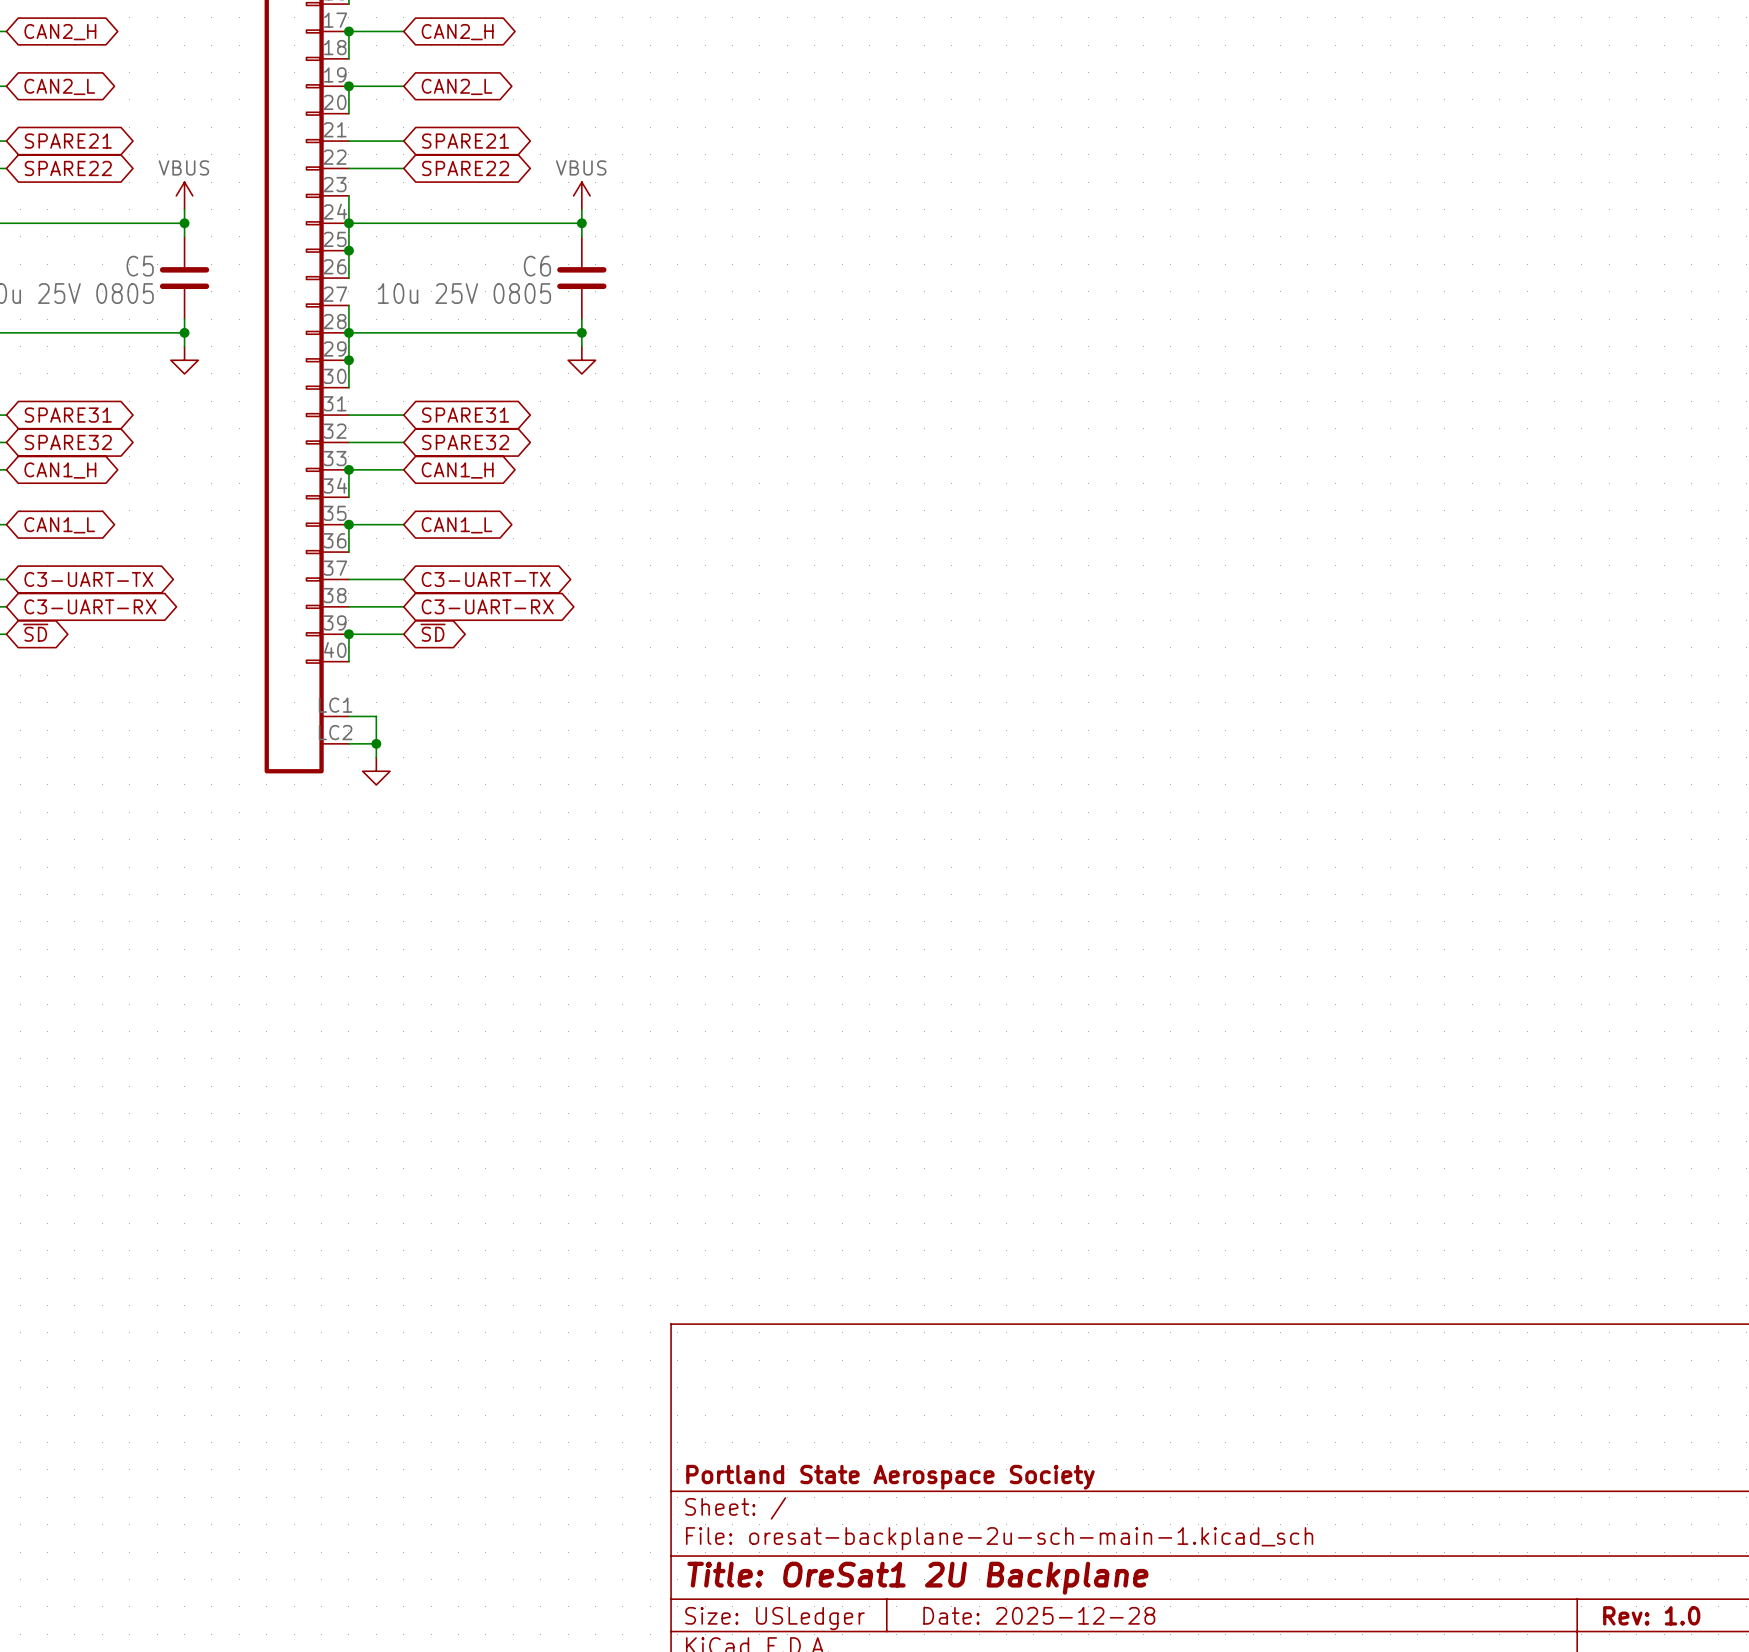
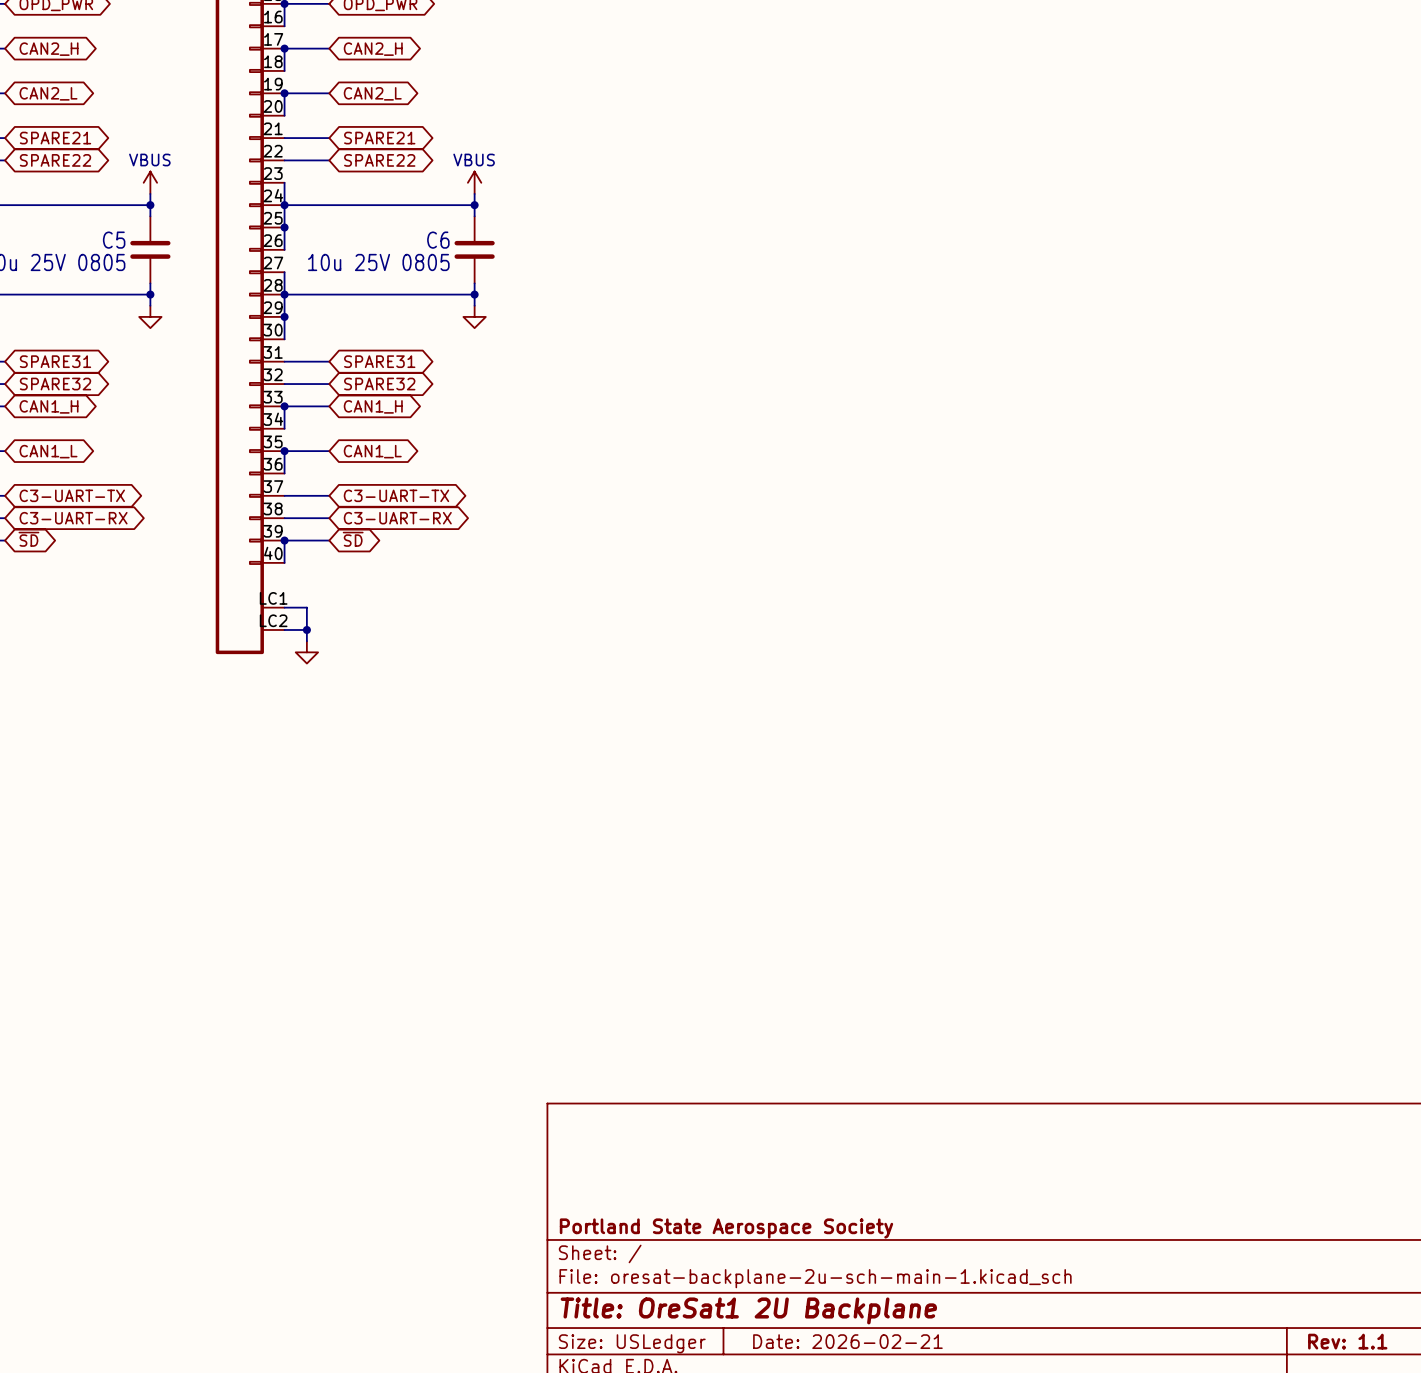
title block: Date: 2025-12-28 (1039, 1615) -> Date: 2026-02-21 (847, 1341)
title block: Rev: 1.0 (1651, 1615) -> Rev: 1.1 (1347, 1341)

